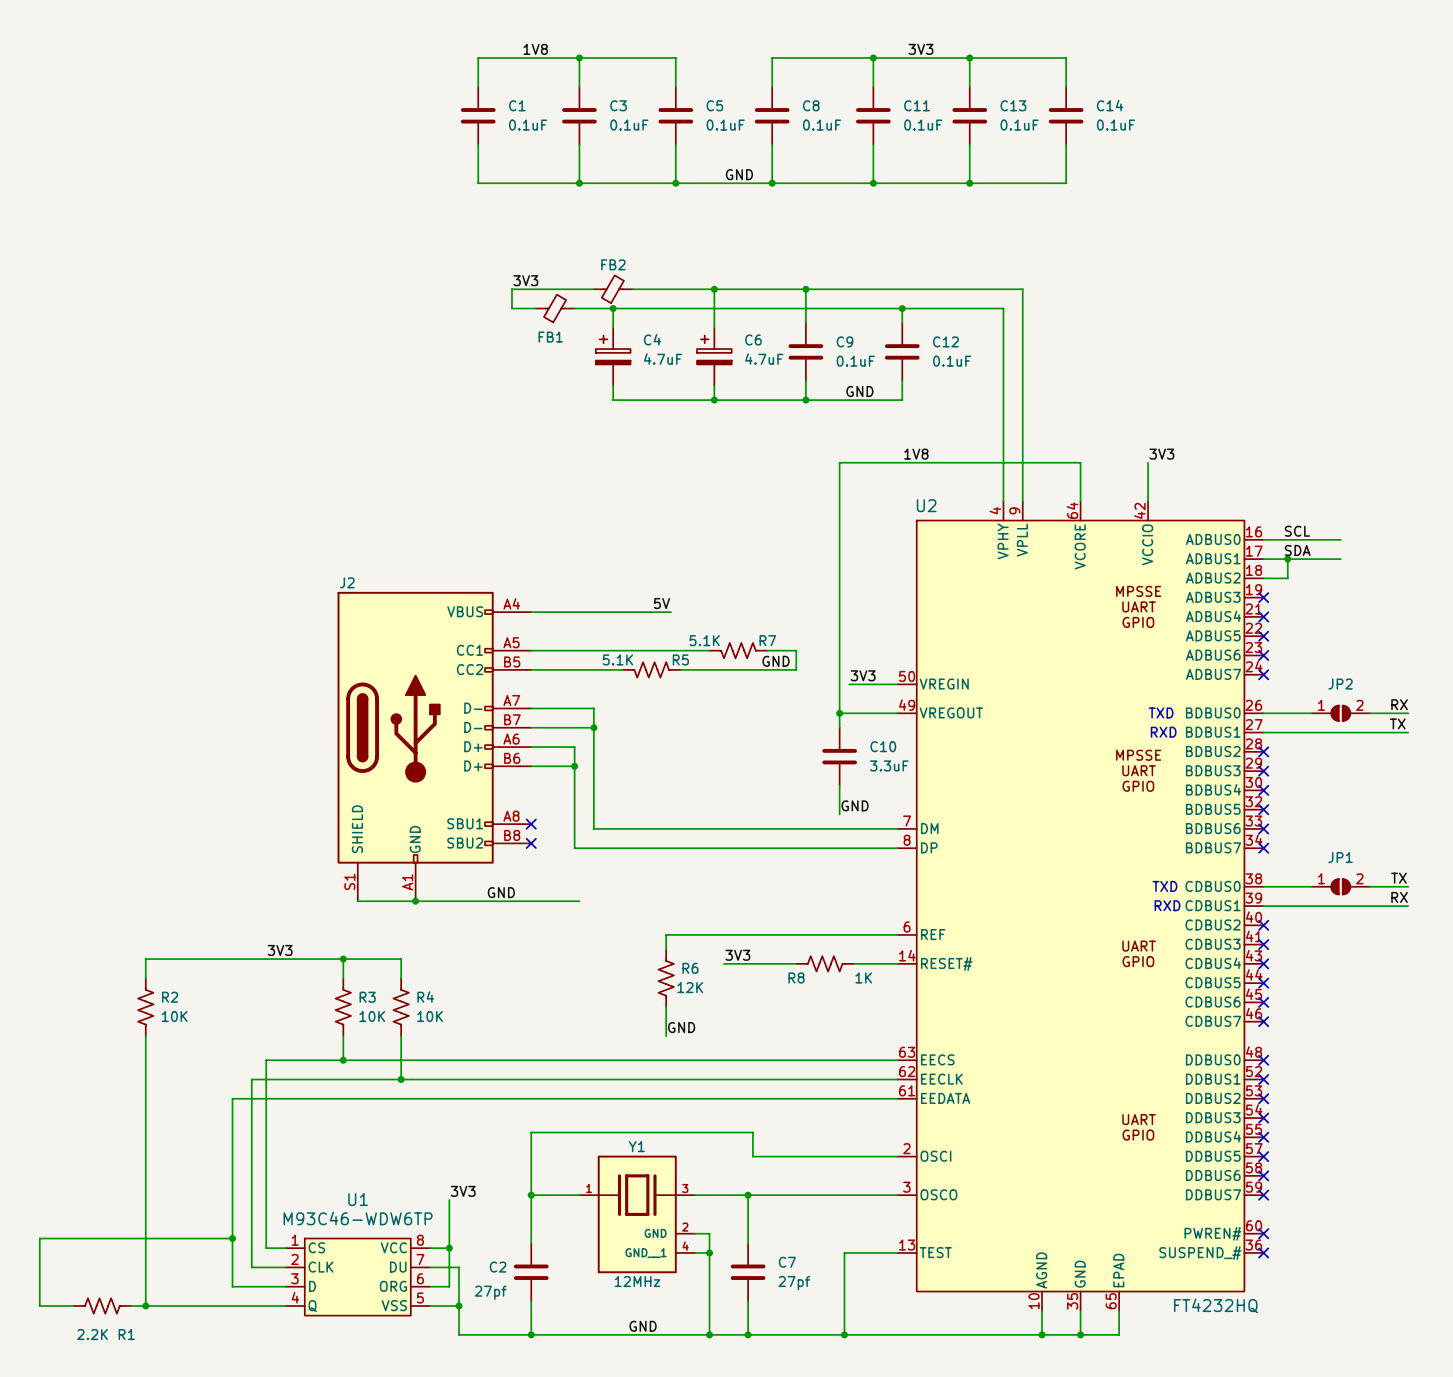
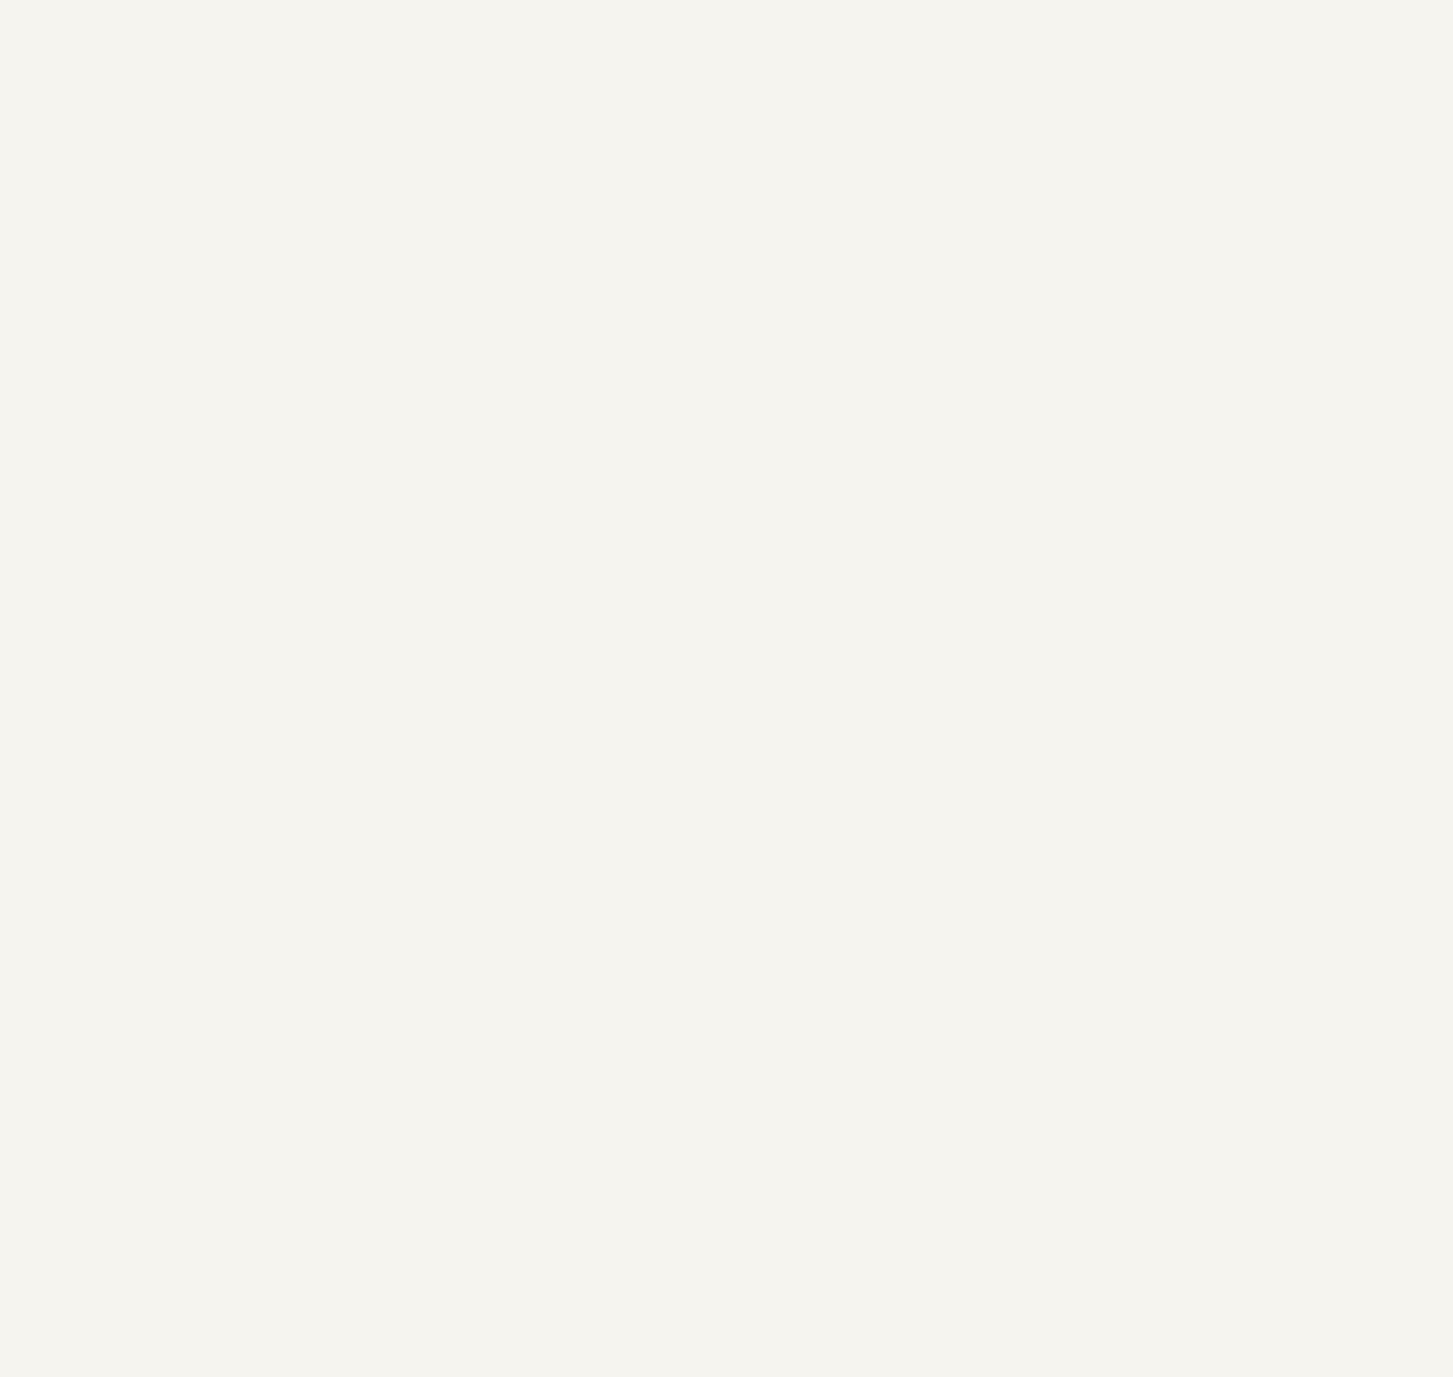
label: 1V8 (535, 49) -> none
label: 3V3 (920, 49) -> none
wire: (579, 57) (579, 86) -> none
junction: (579, 57) -> none
wire: (873, 57) (873, 86) -> none
junction: (873, 57) -> none
wire: (969, 57) (969, 86) -> none
junction: (969, 57) -> none
wire: (478, 86) (478, 57) (675, 57) (675, 86) -> none
wire: (772, 86) (772, 57) (1066, 57) (1066, 86) -> none
C1: 0.1uF (478, 115) -> none
C3: 0.1uF (579, 115) -> none
C5: 0.1uF (675, 115) -> none
C8: 0.1uF (772, 115) -> none
C11: 0.1uF (873, 115) -> none
C13: 0.1uF (969, 115) -> none
C14: 0.1uF (1066, 115) -> none
wire: (478, 144) (478, 183) (1066, 183) (1066, 144) -> none
wire: (579, 144) (579, 183) -> none
wire: (675, 144) (675, 183) -> none
wire: (772, 144) (772, 183) -> none
wire: (873, 144) (873, 183) -> none
wire: (969, 144) (969, 183) -> none
label: GND (739, 174) -> none
junction: (579, 183) -> none
junction: (675, 183) -> none
junction: (772, 183) -> none
junction: (873, 183) -> none
junction: (969, 183) -> none
label: 3V3 (525, 280) -> none
wire: (593, 289) (511, 289) (511, 308) (536, 308) -> none
FB2: (613, 289) -> none
wire: (632, 289) (1022, 289) (1022, 501) -> none
wire: (714, 289) (714, 327) -> none
junction: (714, 289) -> none
wire: (805, 289) (805, 322) -> none
junction: (805, 289) -> none
FB1: (555, 308) -> none
wire: (574, 308) (1003, 308) (1003, 501) -> none
wire: (613, 308) (613, 327) -> none
junction: (613, 308) -> none
wire: (902, 308) (902, 322) -> none
junction: (902, 308) -> none
C9: 0.1uF (805, 351) -> none
C12: 0.1uF (902, 351) -> none
C4: 4.7uF (613, 356) -> none
C6: 4.7uF (714, 356) -> none
wire: (805, 380) (805, 400) -> none
wire: (902, 380) (902, 400) (613, 400) (613, 385) -> none
wire: (714, 385) (714, 400) -> none
label: GND (859, 391) -> none
junction: (714, 400) -> none
junction: (805, 400) -> none
label: 1V8 (916, 454) -> none
label: 3V3 (1161, 454) -> none
wire: (1148, 462) (1148, 501) -> none
wire: (1080, 501) (1080, 462) (839, 462) (839, 727) -> none
label: SCL (1297, 531) -> none
wire: (1263, 539) (1340, 539) -> none
label: SDA (1297, 550) -> none
wire: (1263, 559) (1340, 559) -> none
wire: (1287, 559) (1287, 578) (1263, 578) -> none
junction: (1287, 559) -> none
no-connect mark: (1263, 597) -> none
label: 5V (661, 603) -> none
wire: (531, 612) (670, 612) -> none
no-connect mark: (1263, 616) -> none
no-connect mark: (1263, 636) -> none
wire: (531, 650) (709, 650) -> none
R7: 5.1K (738, 650) -> none
wire: (767, 650) (796, 650) (796, 669) (680, 669) -> none
no-connect mark: (1263, 655) -> none
label: GND (776, 661) -> none
wire: (531, 669) (622, 669) -> none
R5: 5.1K (651, 669) -> none
no-connect mark: (1263, 674) -> none
label: 3V3 (863, 675) -> none
wire: (849, 684) (897, 684) -> none
label: RX (1399, 704) -> none
wire: (531, 708) (593, 708) (593, 828) (897, 828) -> none
text: TXD (1161, 712) -> none
wire: (839, 713) (897, 713) -> none
junction: (839, 713) -> none
wire: (1263, 713) (1311, 713) -> none
JP2: (1340, 713) -> none
wire: (1369, 713) (1408, 713) -> none
label: TX (1397, 723) -> none
wire: (531, 727) (593, 727) -> none
junction: (593, 727) -> none
text: RXD (1163, 732) -> none
wire: (1263, 732) (1408, 732) -> none
J2: (434, 746) -> none
wire: (531, 747) (574, 747) (574, 848) (897, 848) -> none
no-connect mark: (1263, 751) -> none
C10: 3.3uF (839, 756) -> none
wire: (531, 766) (574, 766) -> none
junction: (574, 766) -> none
no-connect mark: (1263, 771) -> none
wire: (839, 785) (839, 814) -> none
no-connect mark: (1263, 790) -> none
label: GND (855, 805) -> none
no-connect mark: (1263, 809) -> none
no-connect mark: (531, 824) -> none
no-connect mark: (1263, 828) -> none
no-connect mark: (531, 843) -> none
no-connect mark: (1263, 848) -> none
label: TX (1398, 878) -> none
text: TXD (1164, 886) -> none
wire: (1263, 886) (1311, 886) -> none
JP1: (1340, 886) -> none
wire: (1369, 886) (1408, 886) -> none
label: GND (501, 892) -> none
label: RX (1399, 897) -> none
wire: (357, 901) (579, 901) -> none
junction: (415, 901) -> none
text: RXD (1167, 905) -> none
U2: FT4232HQ (1080, 906) -> none
wire: (1263, 906) (1408, 906) -> none
no-connect mark: (1263, 925) -> none
wire: (897, 934) (666, 934) (666, 949) -> none
no-connect mark: (1263, 944) -> none
label: 3V3 (280, 950) -> none
label: 3V3 (737, 955) -> none
wire: (343, 959) (343, 978) -> none
junction: (343, 959) -> none
wire: (723, 963) (796, 963) -> none
R8: 1K (825, 963) -> none
wire: (854, 963) (897, 963) -> none
no-connect mark: (1263, 963) -> none
wire: (145, 978) (145, 959) (401, 959) (401, 978) -> none
R6: 12K (666, 978) -> none
no-connect mark: (1263, 983) -> none
no-connect mark: (1263, 1002) -> none
R2: 10K (145, 1007) -> none
R3: 10K (343, 1007) -> none
R4: 10K (401, 1007) -> none
wire: (666, 1007) (666, 1036) -> none
no-connect mark: (1263, 1021) -> none
label: GND (681, 1027) -> none
wire: (145, 1036) (145, 1305) -> none
wire: (343, 1036) (343, 1060) -> none
wire: (401, 1036) (401, 1079) -> none
junction: (343, 1060) -> none
wire: (897, 1060) (266, 1060) (266, 1248) (285, 1248) -> none
no-connect mark: (1263, 1060) -> none
junction: (401, 1079) -> none
wire: (897, 1079) (251, 1079) (251, 1267) (285, 1267) -> none
no-connect mark: (1263, 1079) -> none
wire: (897, 1098) (232, 1098) (232, 1286) (285, 1286) -> none
no-connect mark: (1263, 1098) -> none
no-connect mark: (1263, 1118) -> none
no-connect mark: (1263, 1137) -> none
wire: (897, 1156) (752, 1156) (752, 1132) (531, 1132) (531, 1243) -> none
no-connect mark: (1263, 1156) -> none
no-connect mark: (1263, 1175) -> none
label: 3V3 (463, 1191) -> none
wire: (531, 1195) (579, 1195) -> none
junction: (531, 1195) -> none
wire: (695, 1195) (897, 1195) -> none
wire: (748, 1195) (748, 1243) -> none
junction: (748, 1195) -> none
no-connect mark: (1263, 1195) -> none
wire: (449, 1199) (449, 1286) (430, 1286) -> none
Y1: 12MHz (637, 1214) -> none
wire: (695, 1233) (709, 1233) (709, 1334) -> none
no-connect mark: (1263, 1233) -> none
wire: (232, 1238) (39, 1238) (39, 1305) (73, 1305) -> none
junction: (232, 1238) -> none
wire: (430, 1248) (449, 1248) -> none
junction: (449, 1248) -> none
wire: (695, 1252) (709, 1252) -> none
junction: (709, 1252) -> none
wire: (897, 1252) (844, 1252) (844, 1334) -> none
no-connect mark: (1263, 1252) -> none
wire: (430, 1267) (458, 1267) (458, 1334) (1119, 1334) (1119, 1310) -> none
C2: 27pf (531, 1272) -> none
C7: 27pf (748, 1272) -> none
U1: M93C46-WDW6TP (357, 1277) -> none
wire: (531, 1301) (531, 1334) -> none
wire: (748, 1301) (748, 1334) -> none
R1: 2.2K (102, 1305) -> none
wire: (131, 1305) (285, 1305) -> none
junction: (145, 1305) -> none
wire: (430, 1305) (458, 1305) -> none
junction: (458, 1305) -> none
wire: (1042, 1310) (1042, 1334) -> none
wire: (1080, 1310) (1080, 1334) -> none
label: GND (643, 1326) -> none
junction: (531, 1334) -> none
junction: (709, 1334) -> none
junction: (748, 1334) -> none
junction: (844, 1334) -> none
junction: (1042, 1334) -> none
junction: (1080, 1334) -> none

